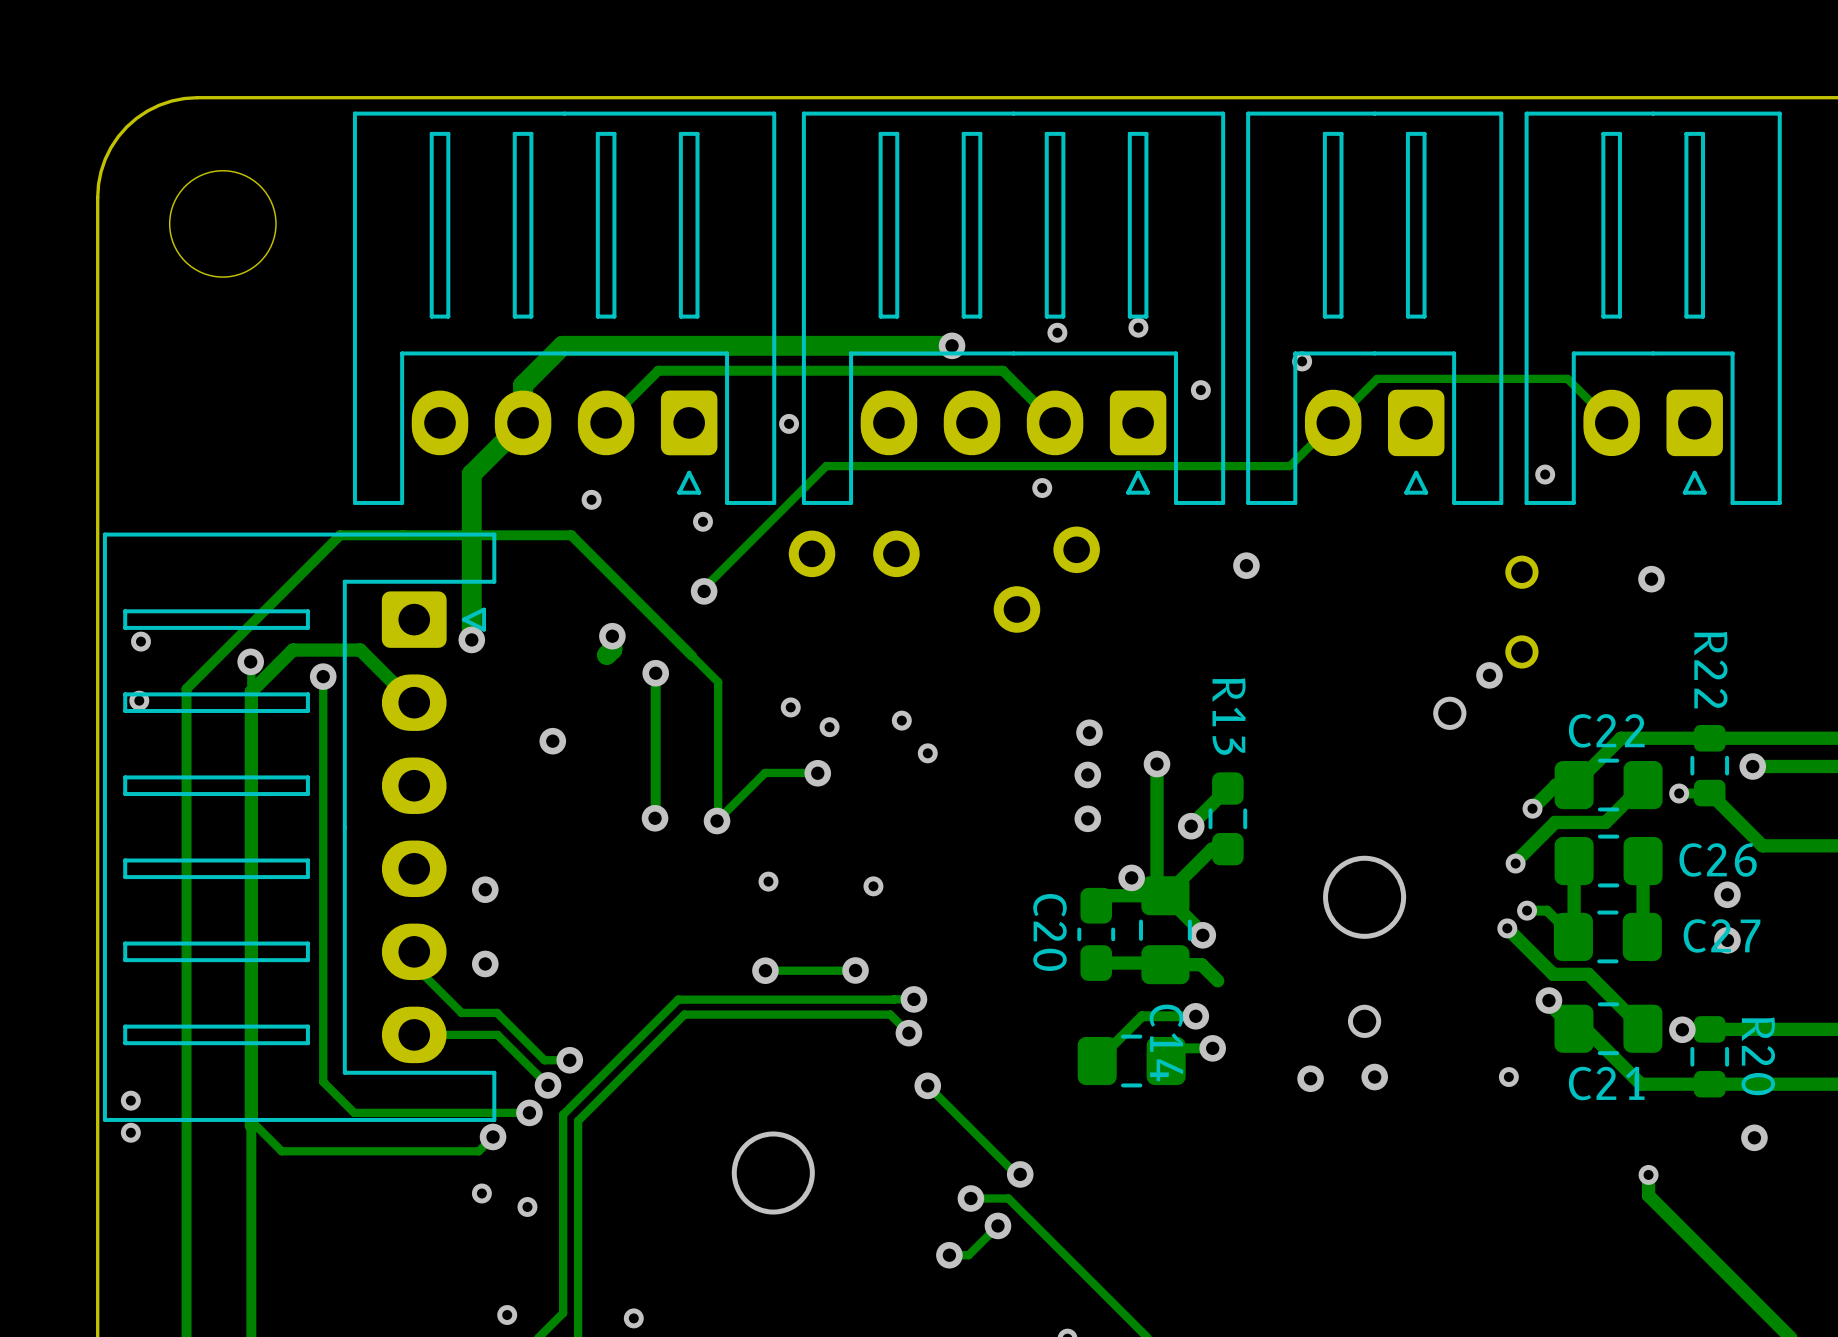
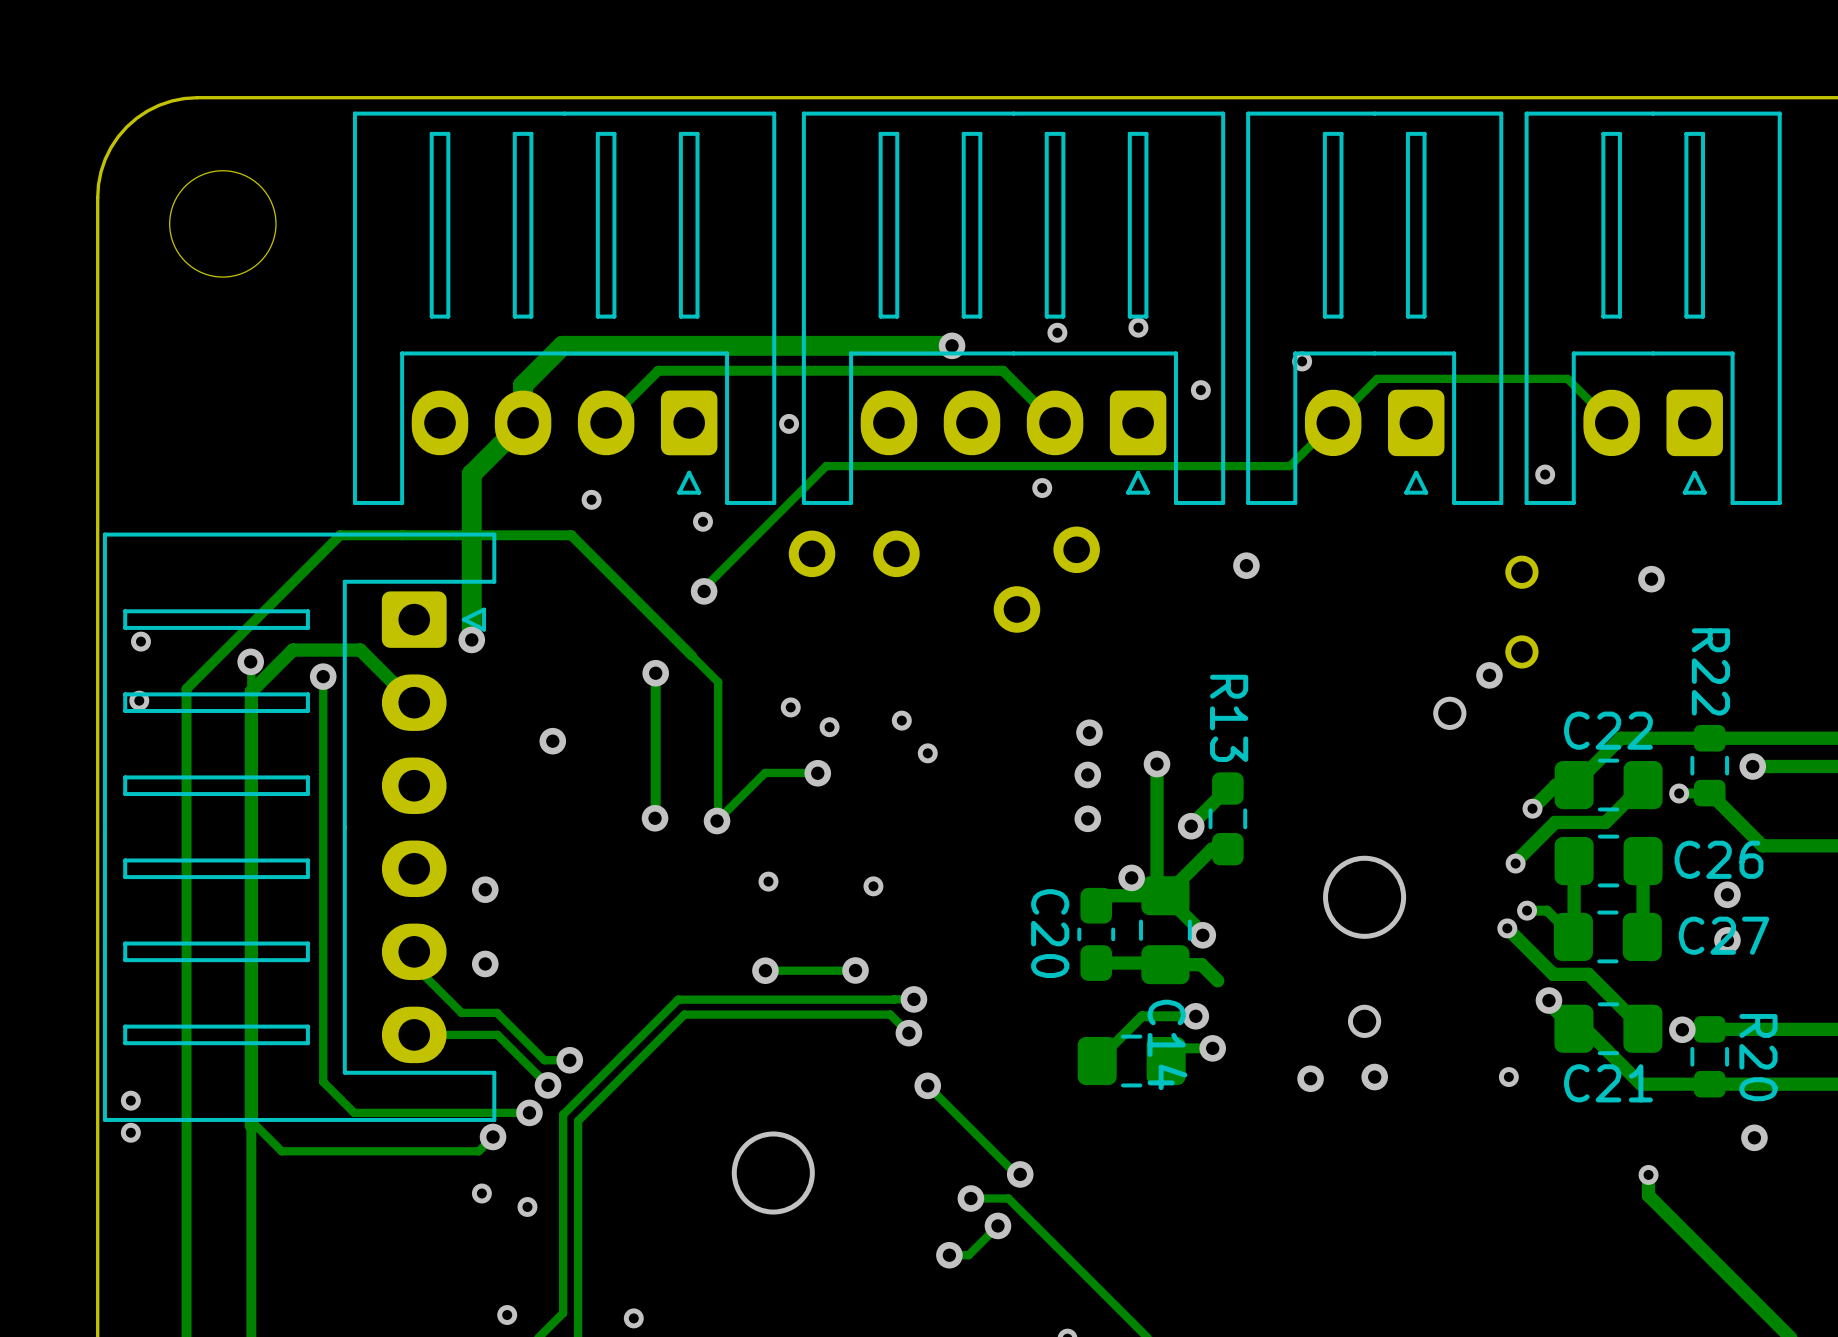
track: (612, 636) (612, 649) (606, 655) -> none
via: (612, 636) -> none

